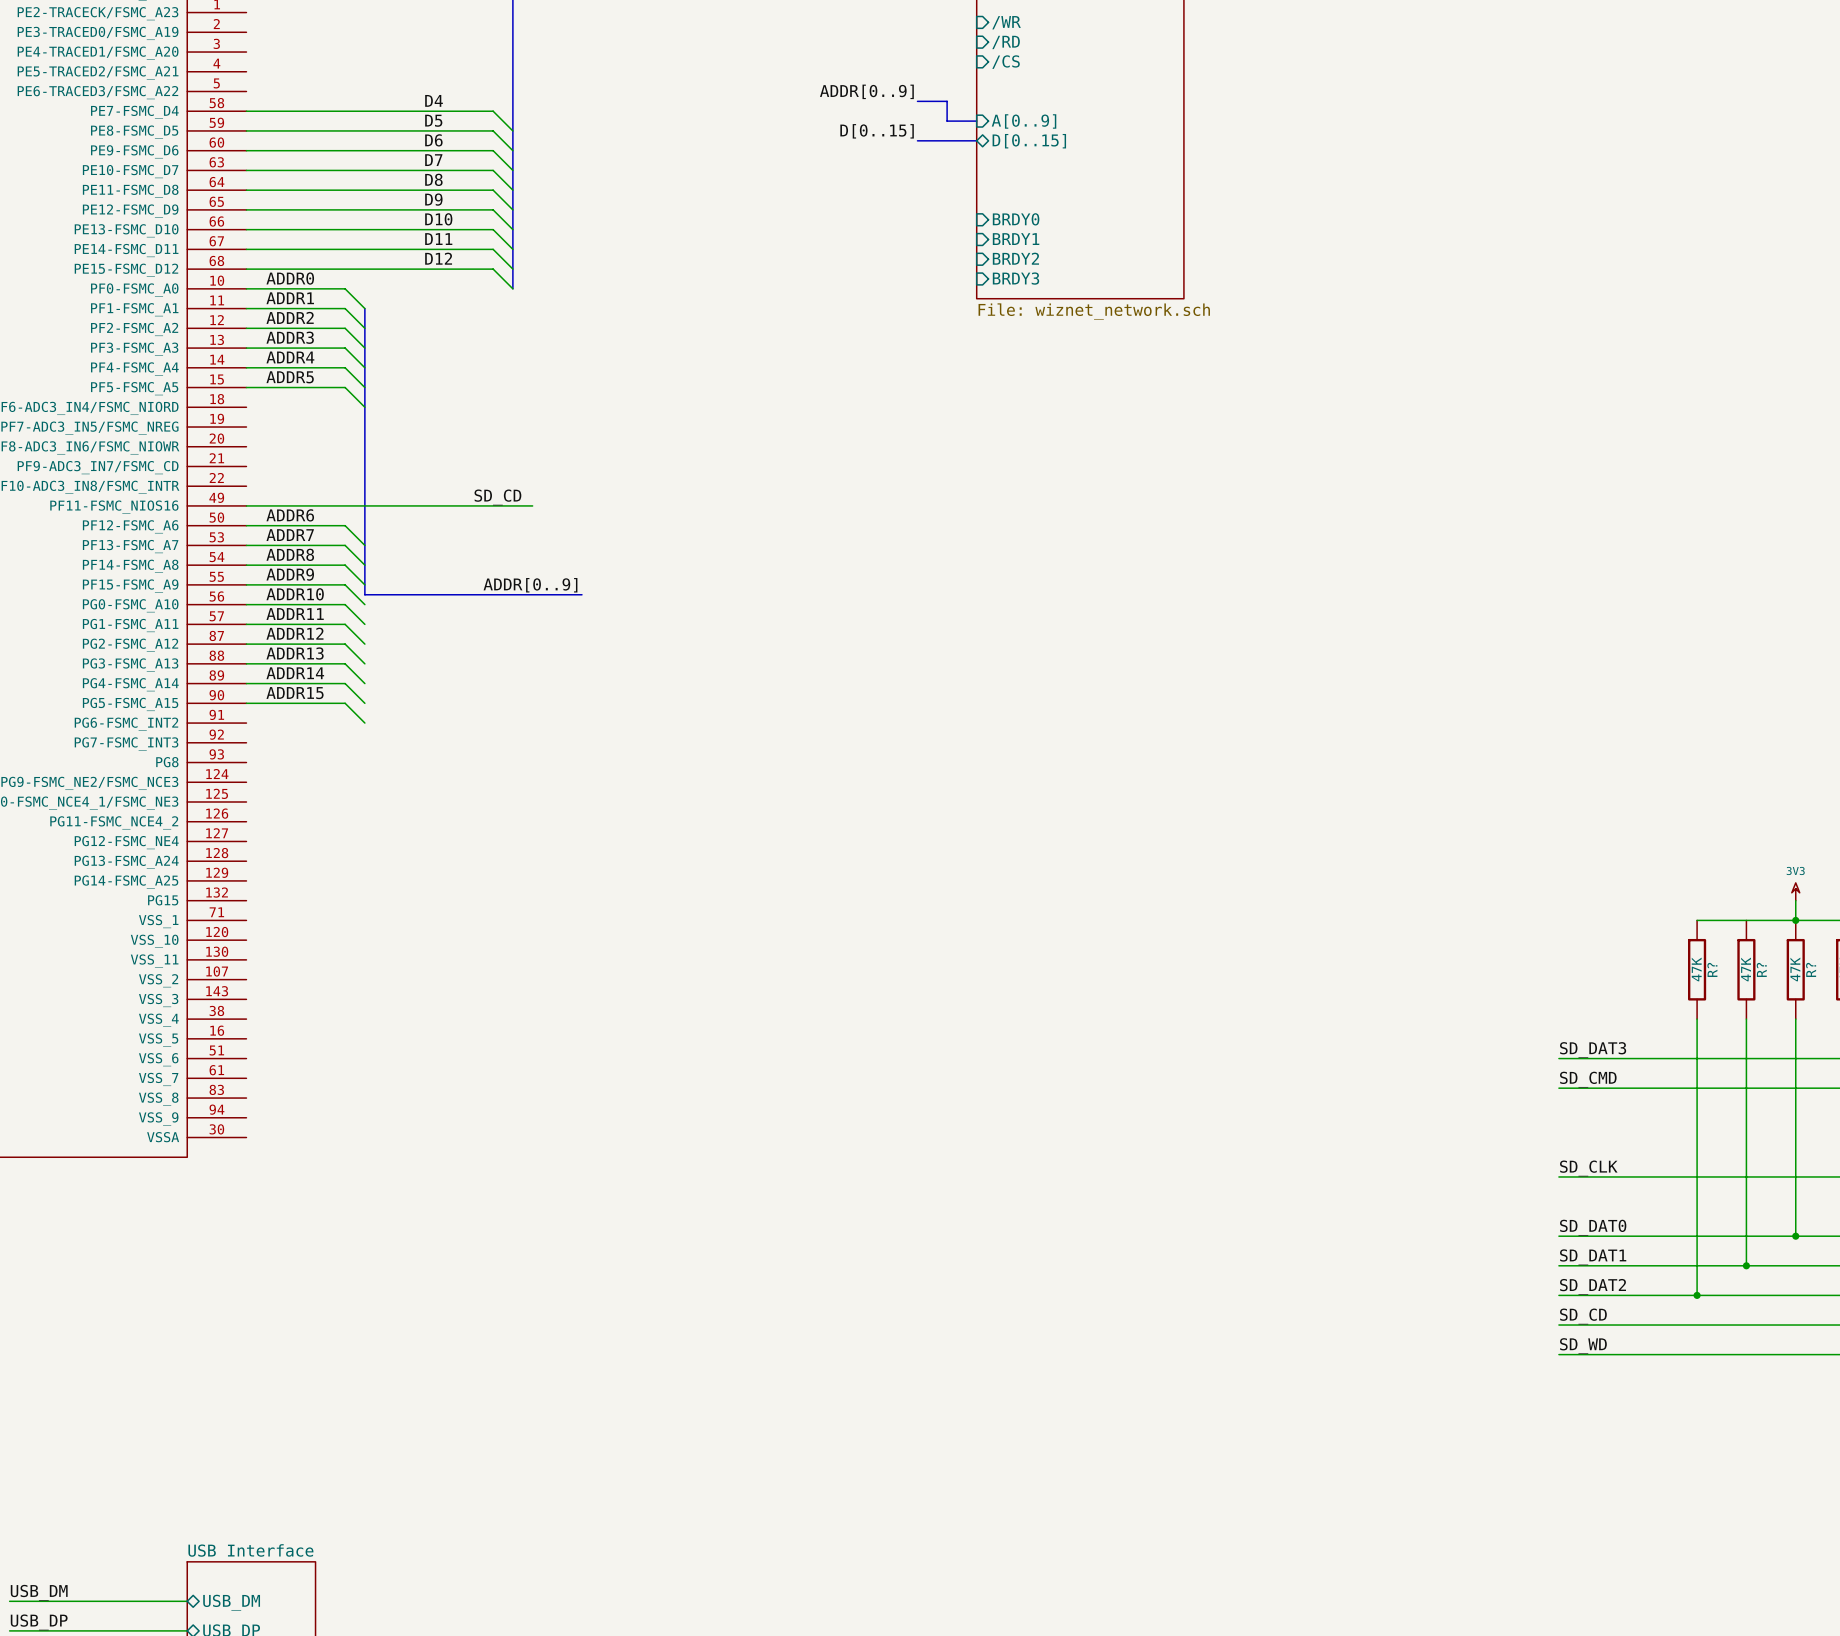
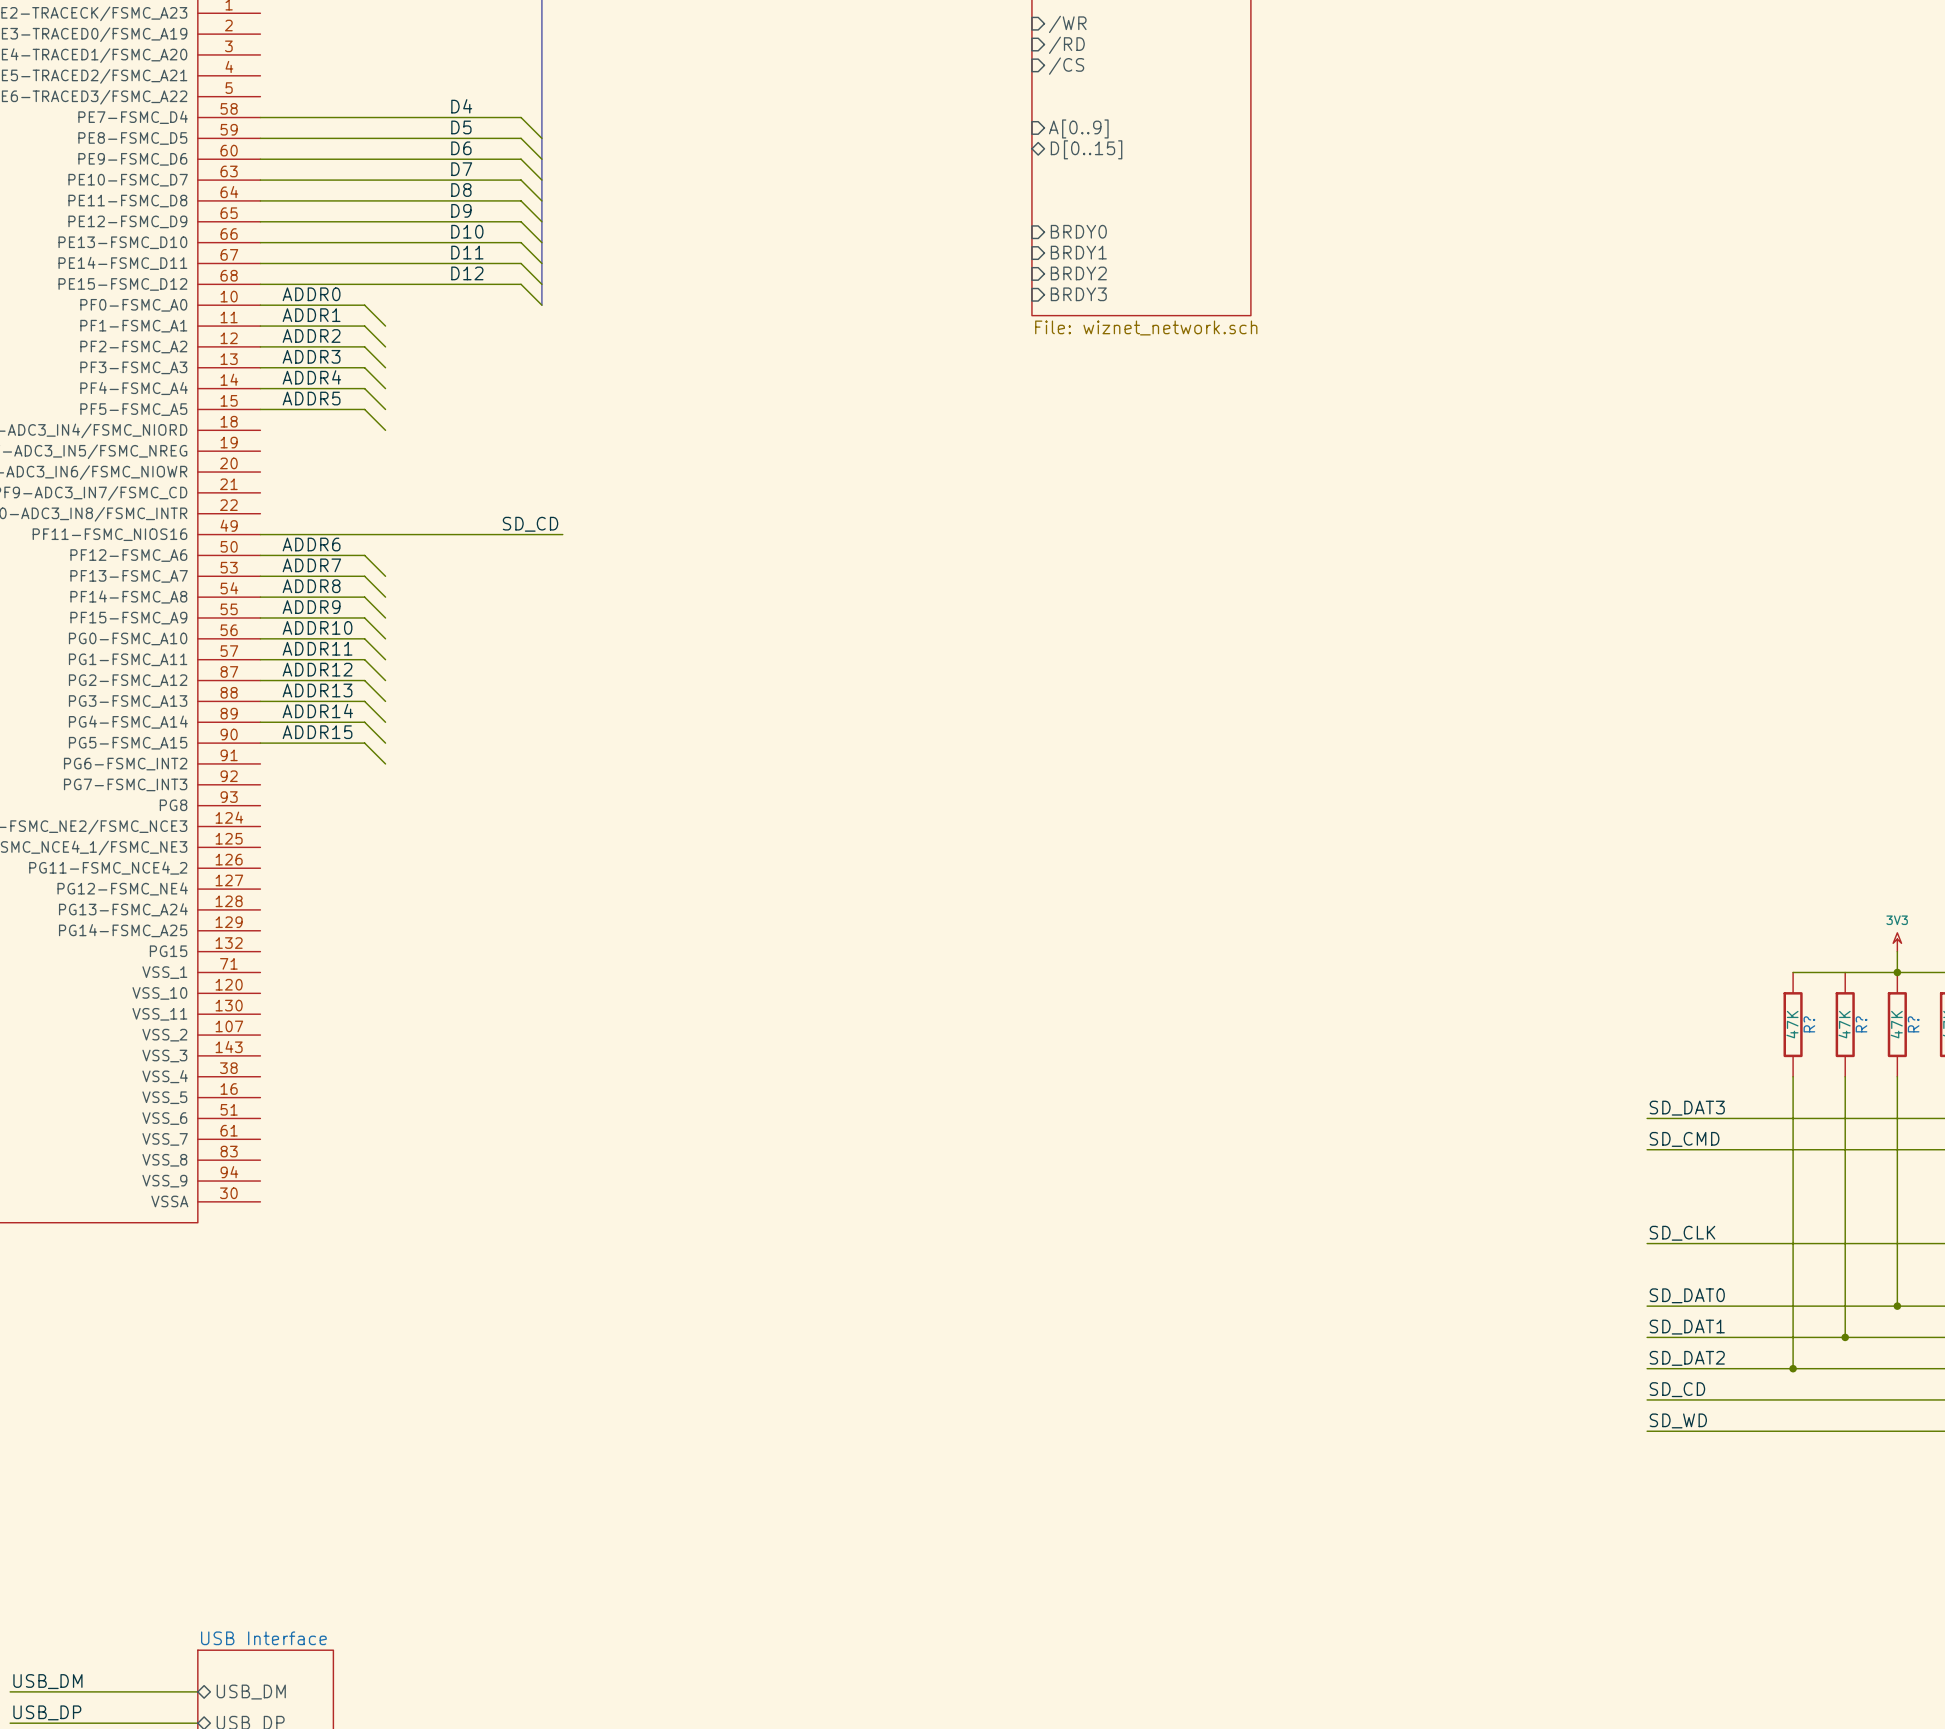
label: ADDR[0..9] (866, 91) -> none
bus: (917, 101) (947, 101) (947, 121) (976, 121) -> none
label: D[0..15] (877, 131) -> none
bus: (917, 140) (976, 140) -> none
bus: (364, 308) (364, 594) (581, 594) -> none
label: ADDR[0..9] (530, 585) -> none

